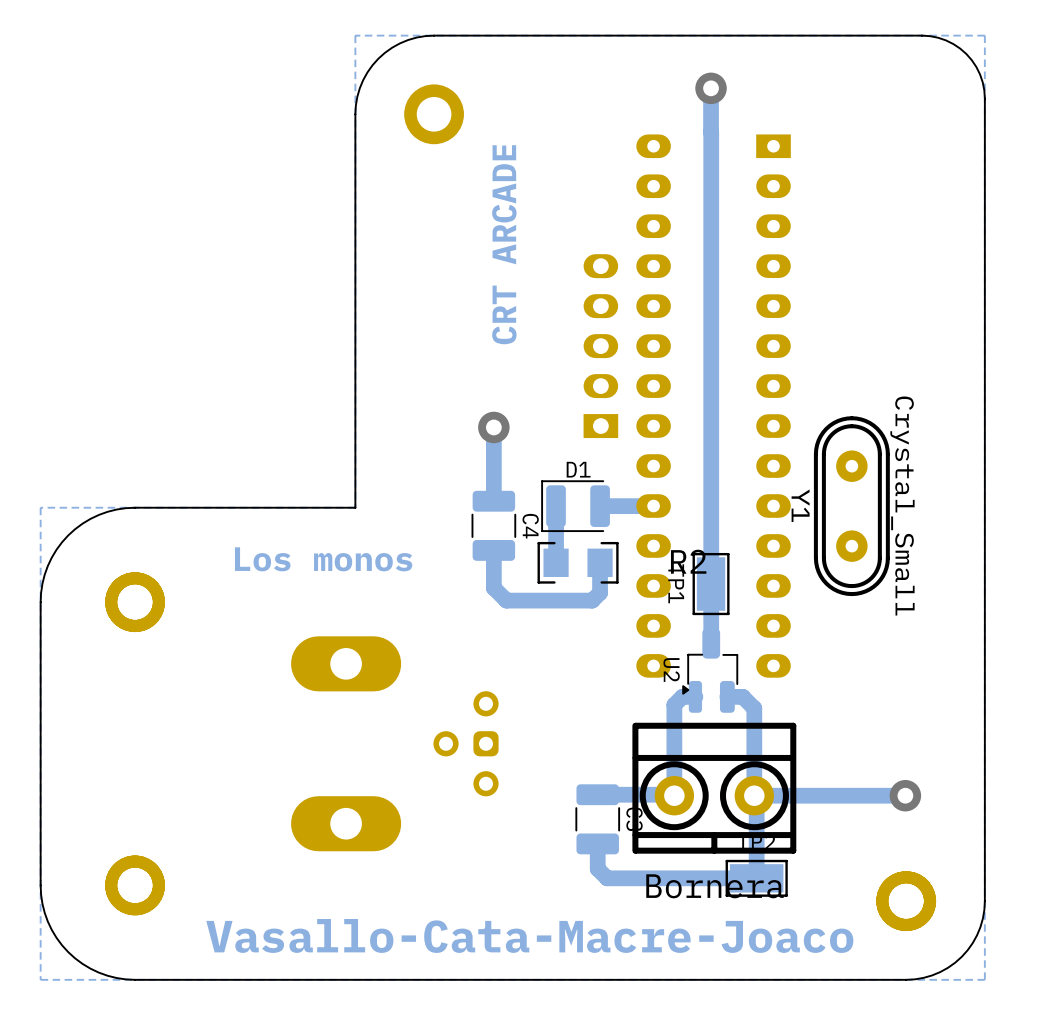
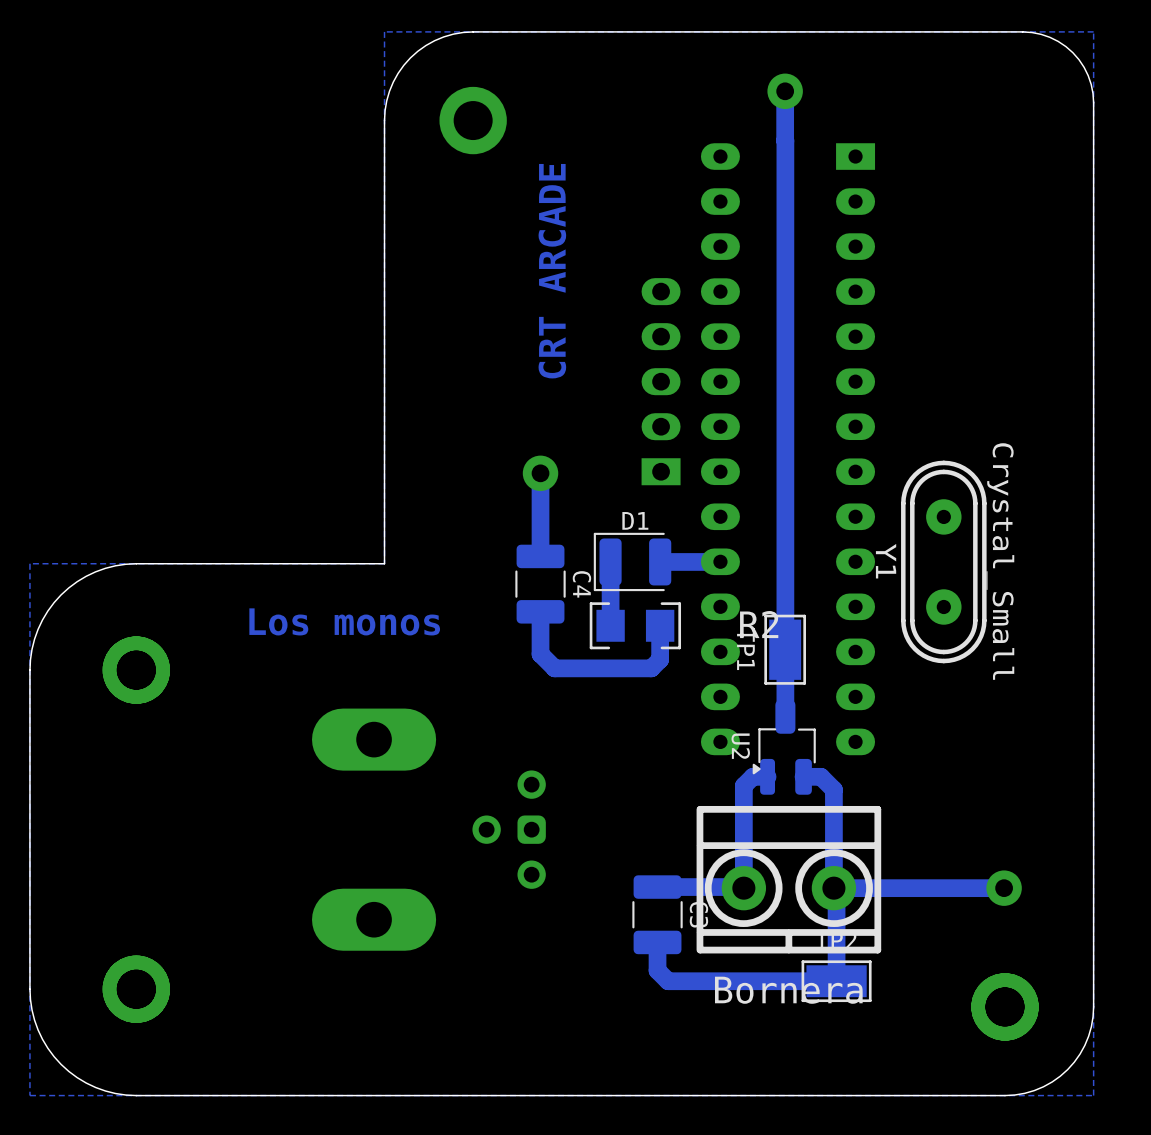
text: Vasallo-Cata-Macre-Joaco (529, 935) -> none

